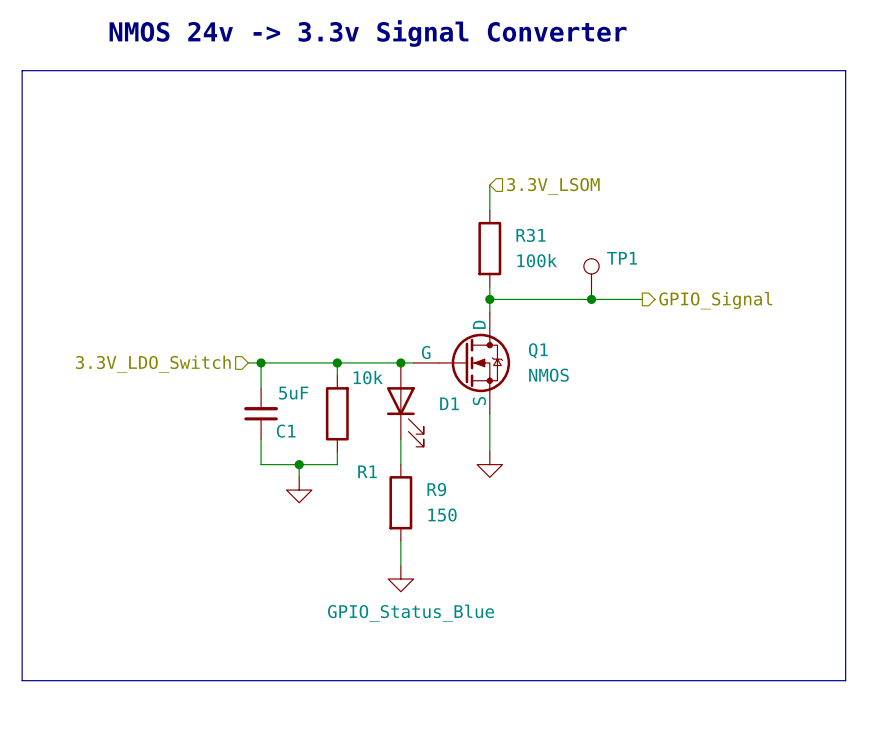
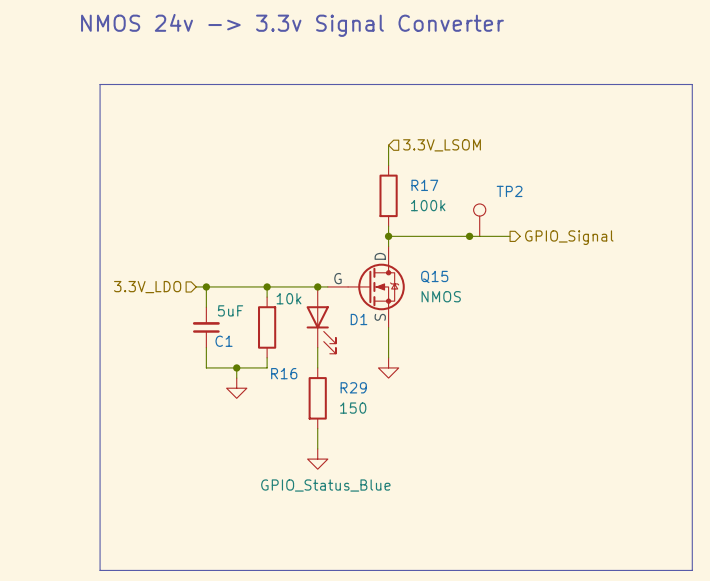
line: (22, 70) (845, 70) (845, 680) (22, 680) (22, 70) -> (100, 84) (100, 570) (692, 570) (692, 84) (100, 84)
R31 name: R31 (531, 235) -> R17 (424, 185)
TP1: (591, 279) -> none
TP2: none -> (479, 220)
Q1 name: Q1 (538, 350) -> Q15 (434, 276)
hierarchical label: 3.3V_LDO_Switch (153, 364) -> 3.3V_LDO (147, 287)
R1 name: R1 (367, 471) -> R16 (284, 373)
R9 name: R9 (436, 489) -> R29 (353, 387)

